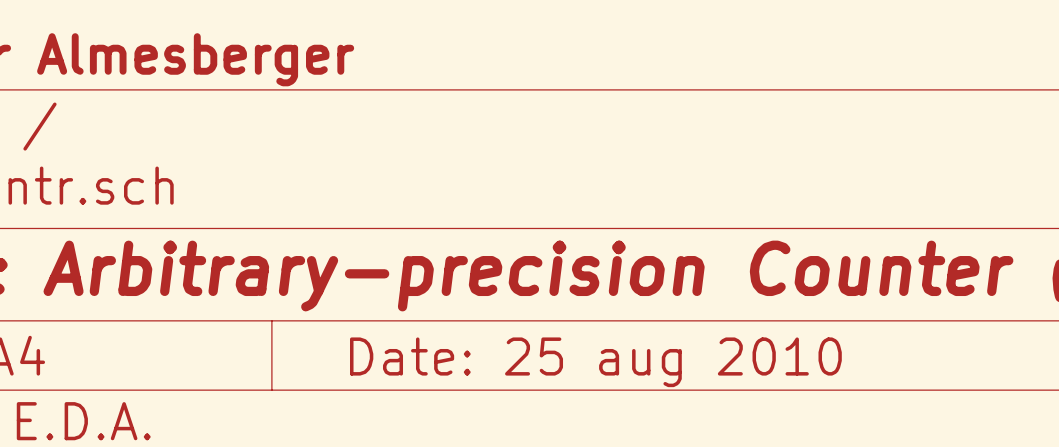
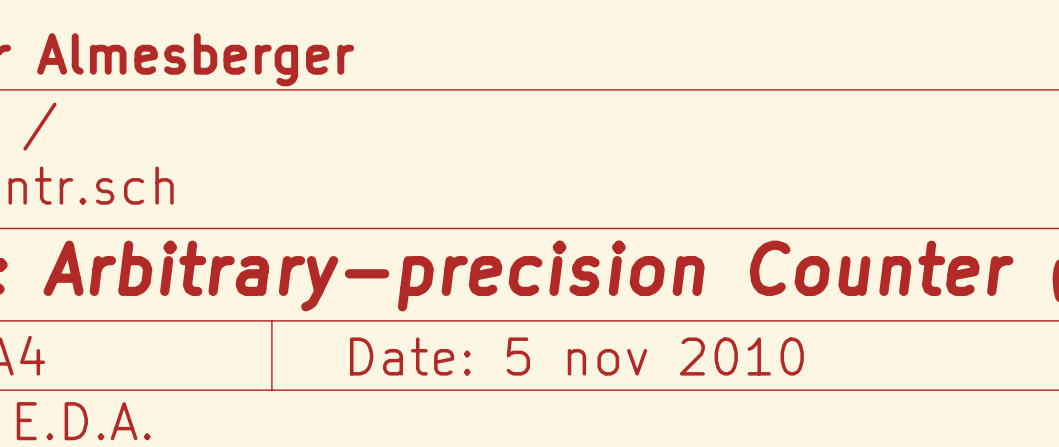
title block: Date: 25 aug 2010 (595, 362) -> Date: 5 nov 2010 (576, 356)

